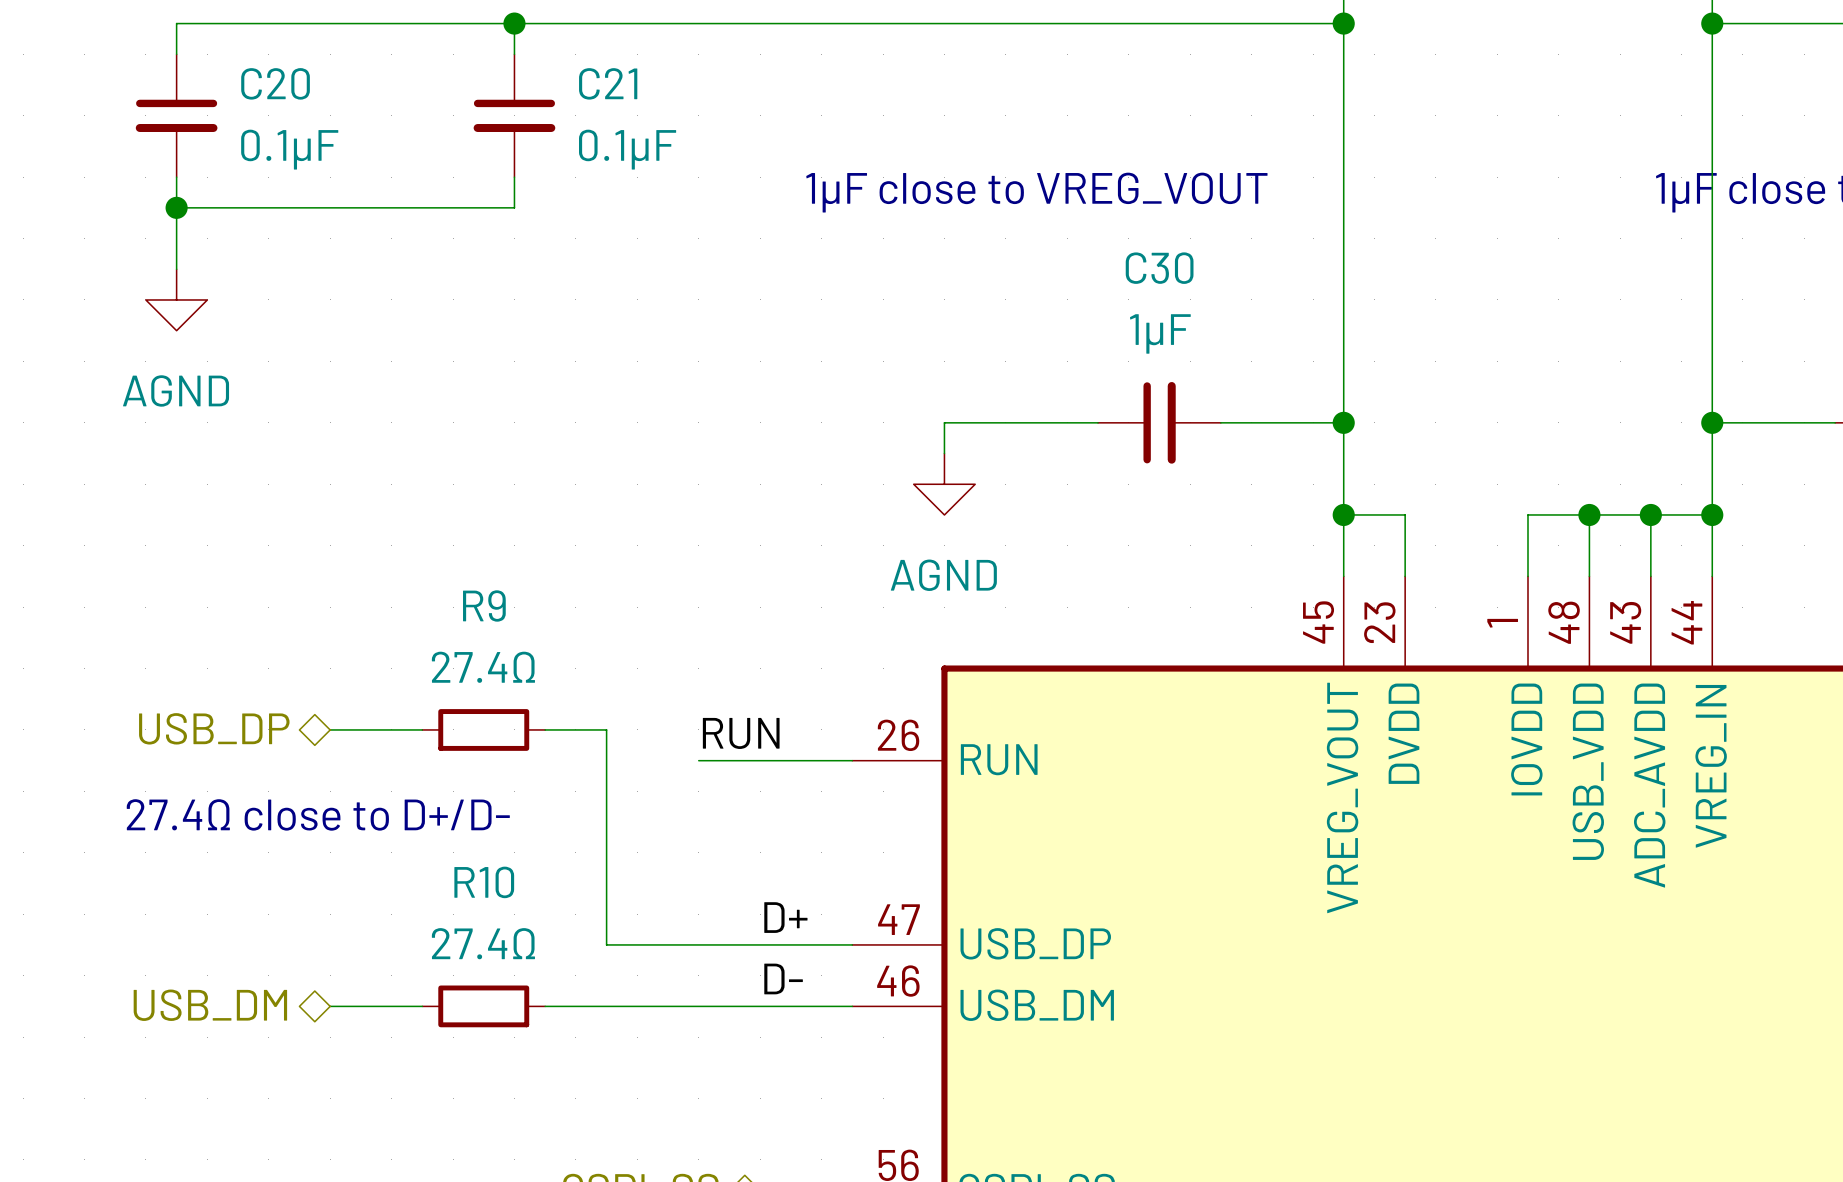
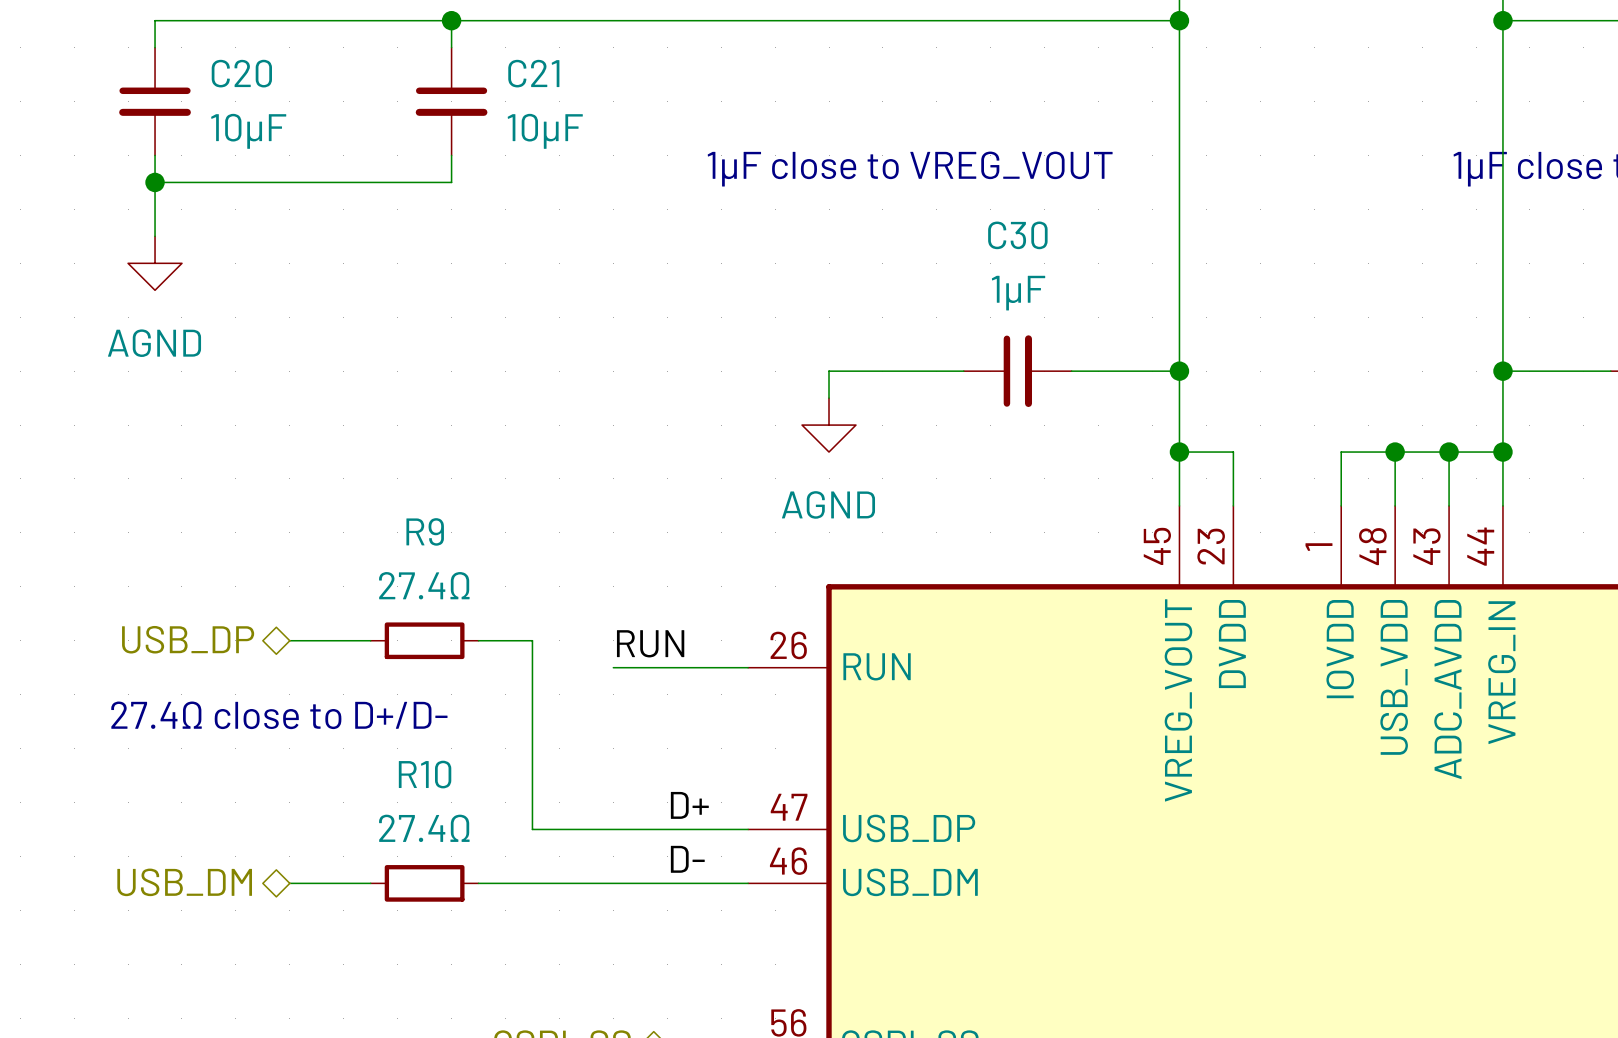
C20 value: 0.1µF (289, 149) -> 10µF (248, 131)
C21 value: 0.1µF (627, 149) -> 10µF (545, 131)

